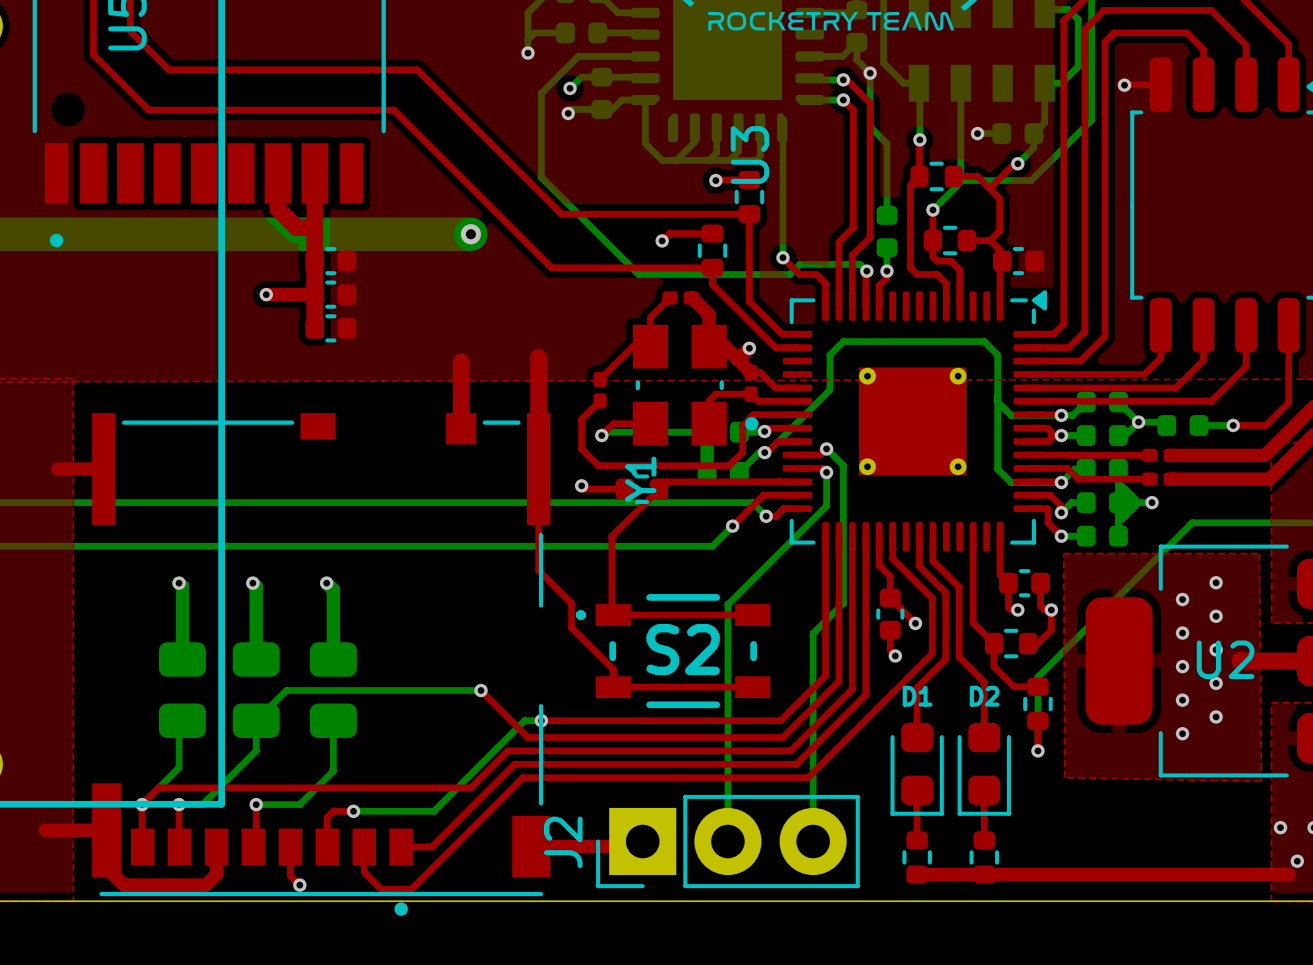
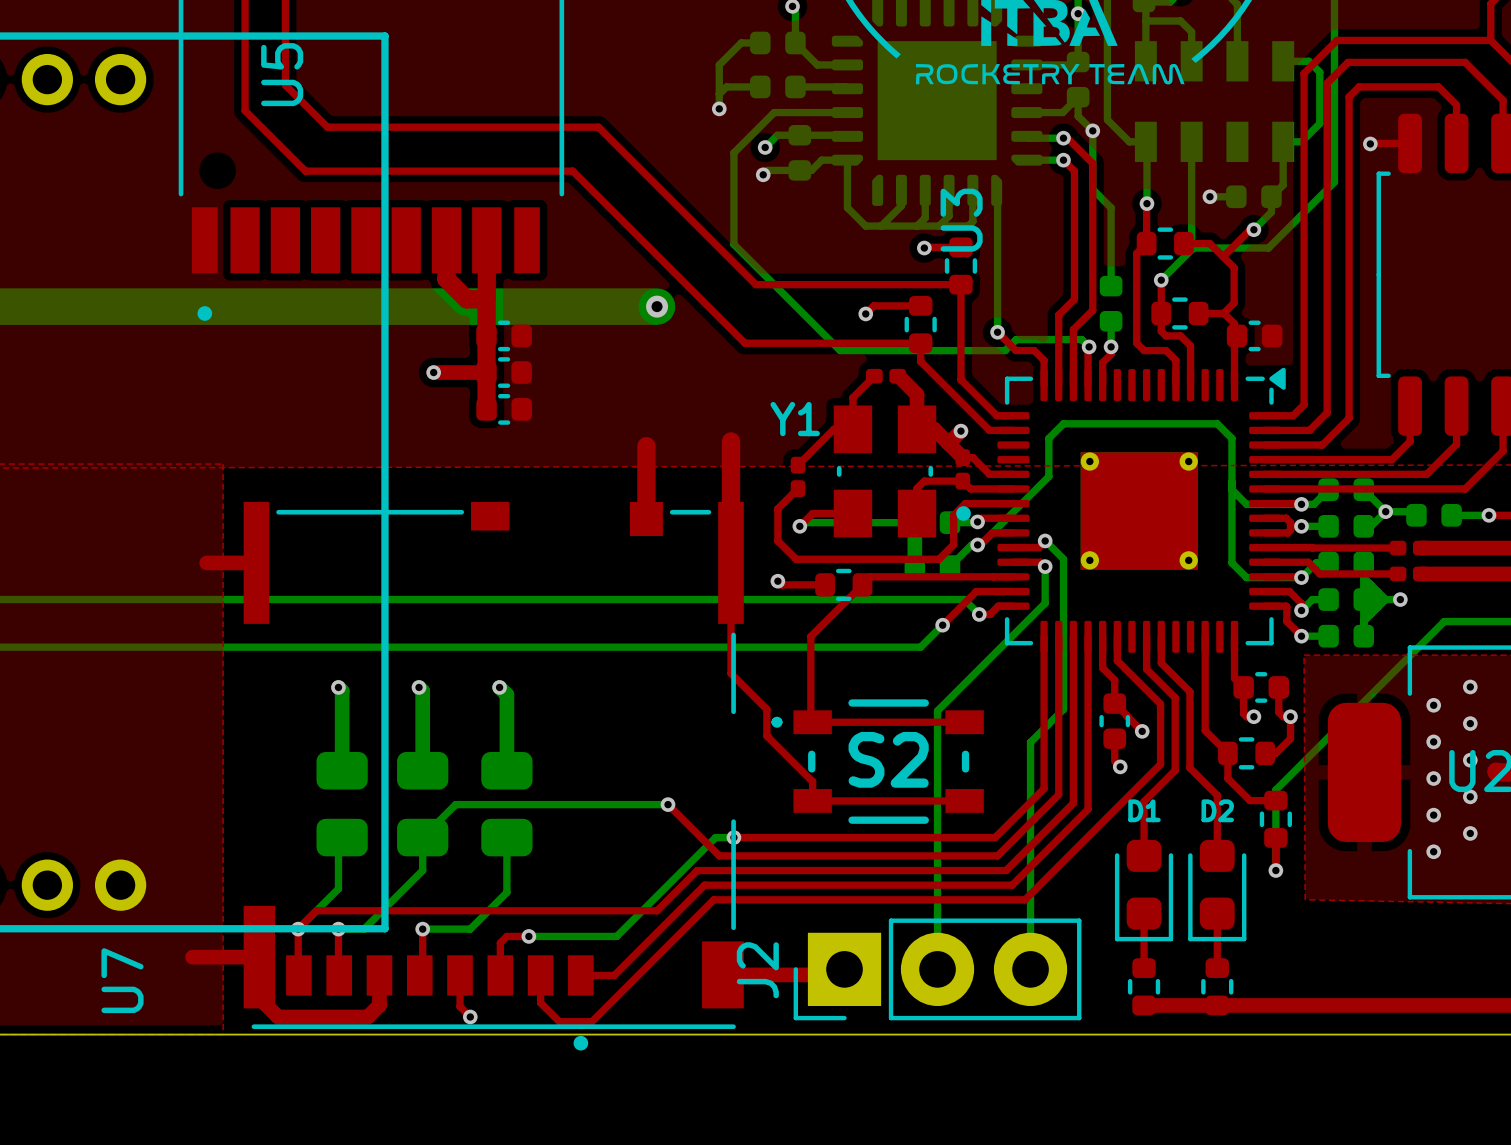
Y1 name rotation: 0° (640, 479) -> 90° clockwise (795, 419)
Y1 name position: Y1 (640, 479) -> Y1 (795, 419)

